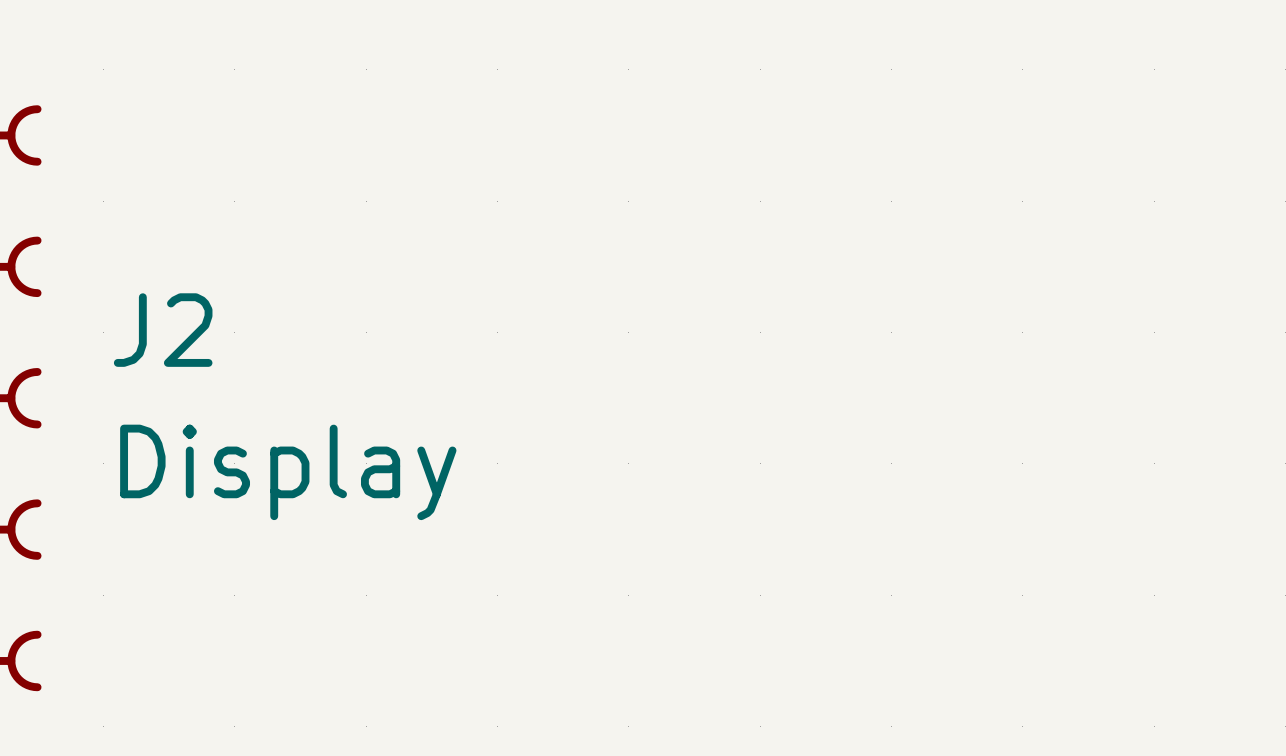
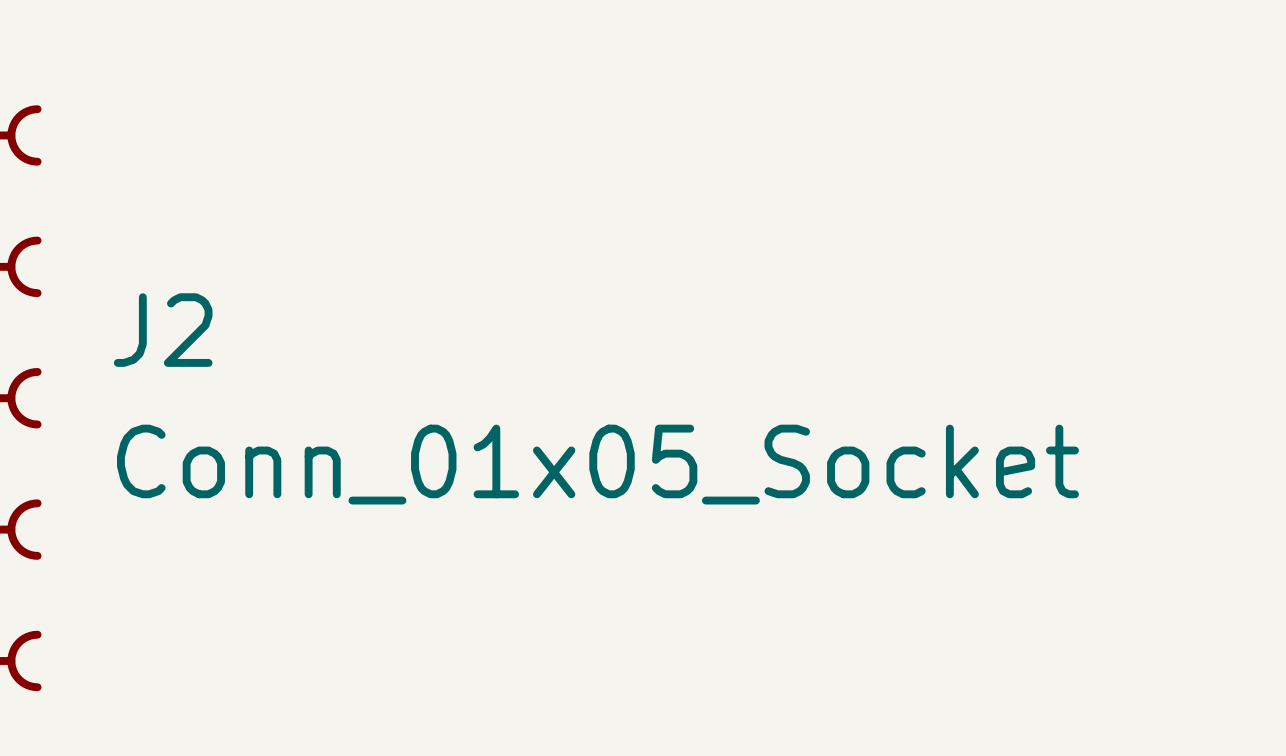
J2 value: Display (288, 472) -> Conn_01x05_Socket (597, 464)

